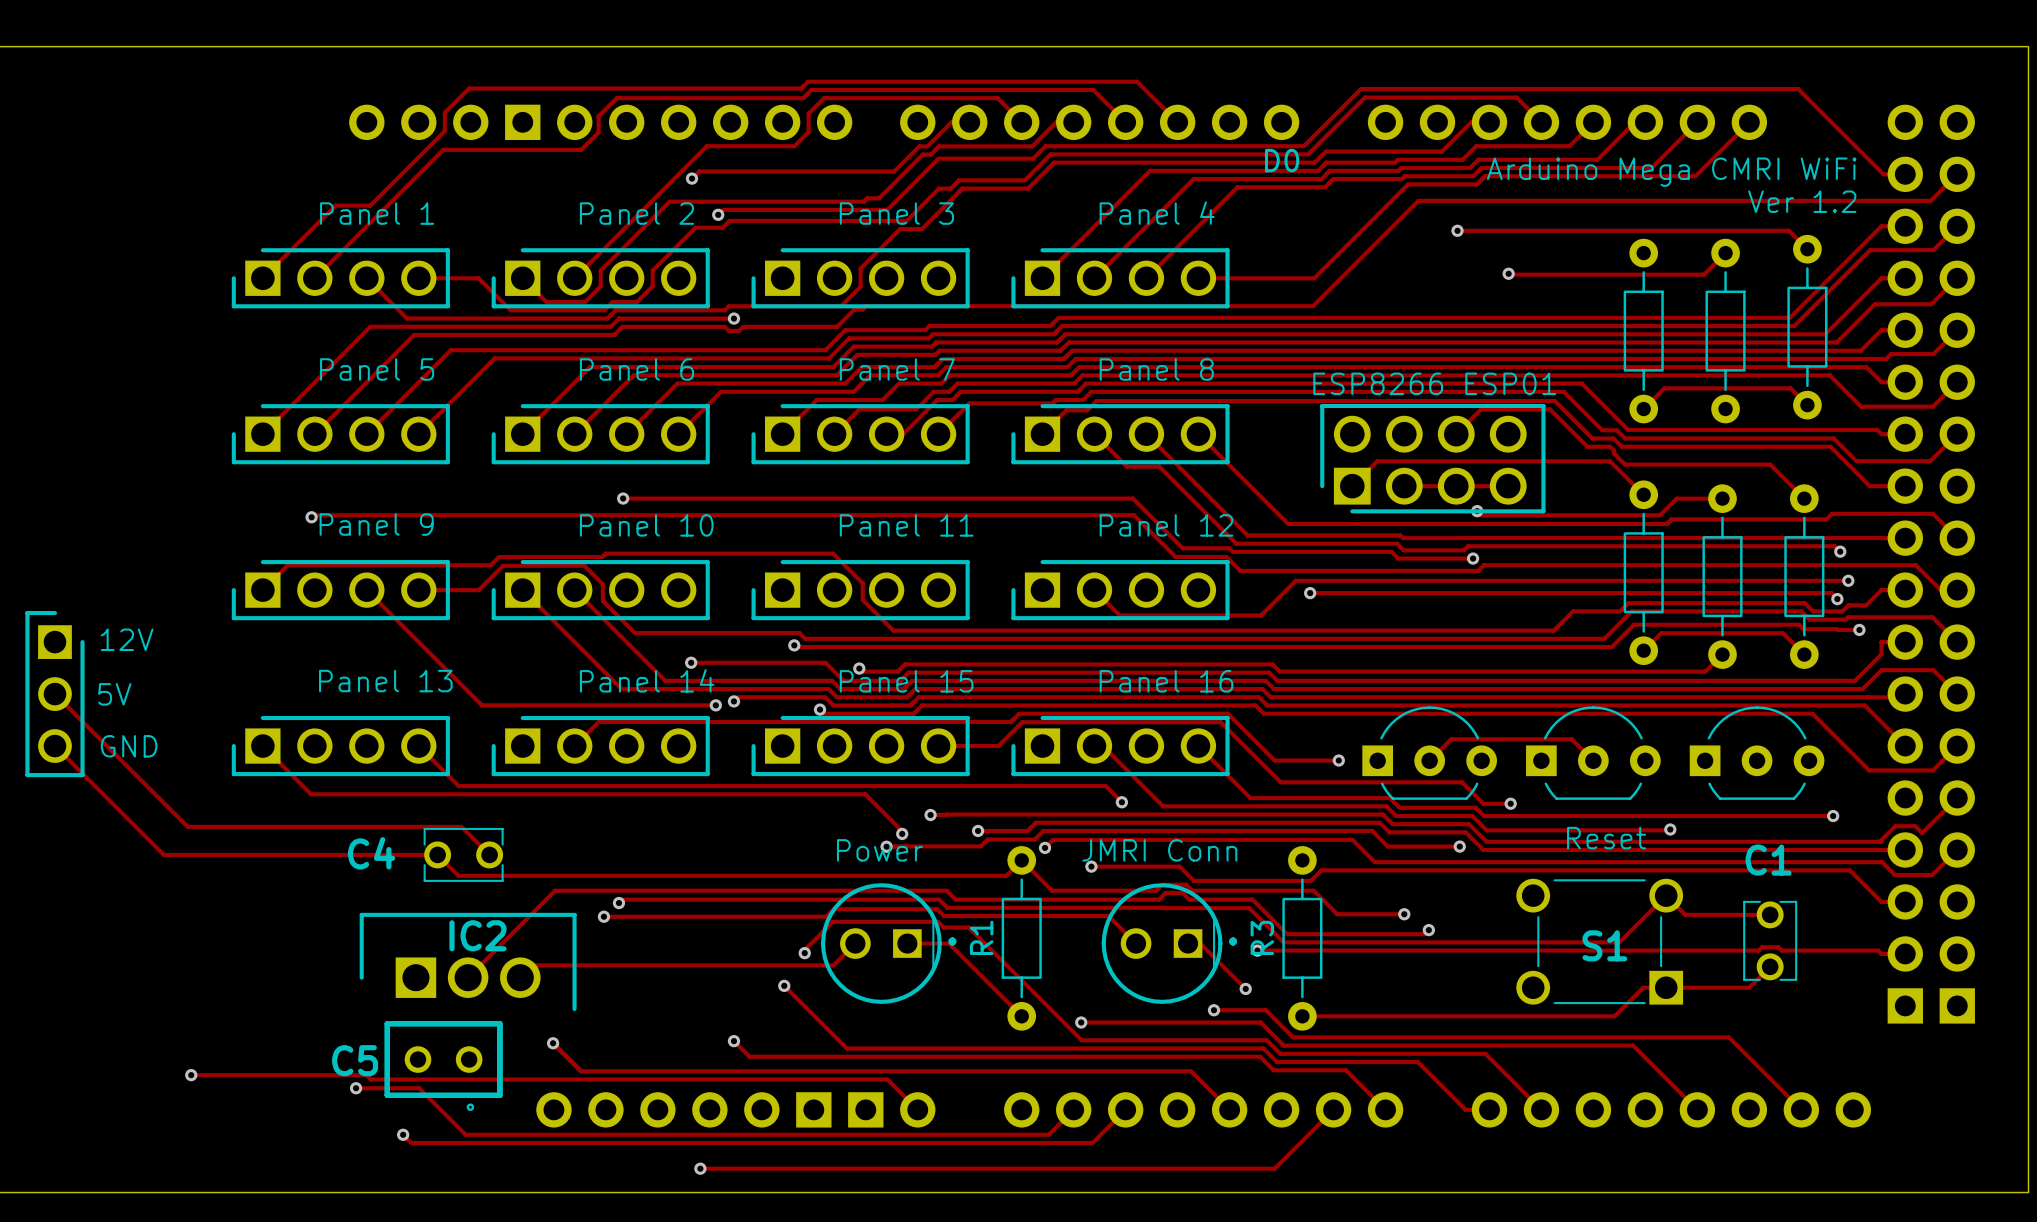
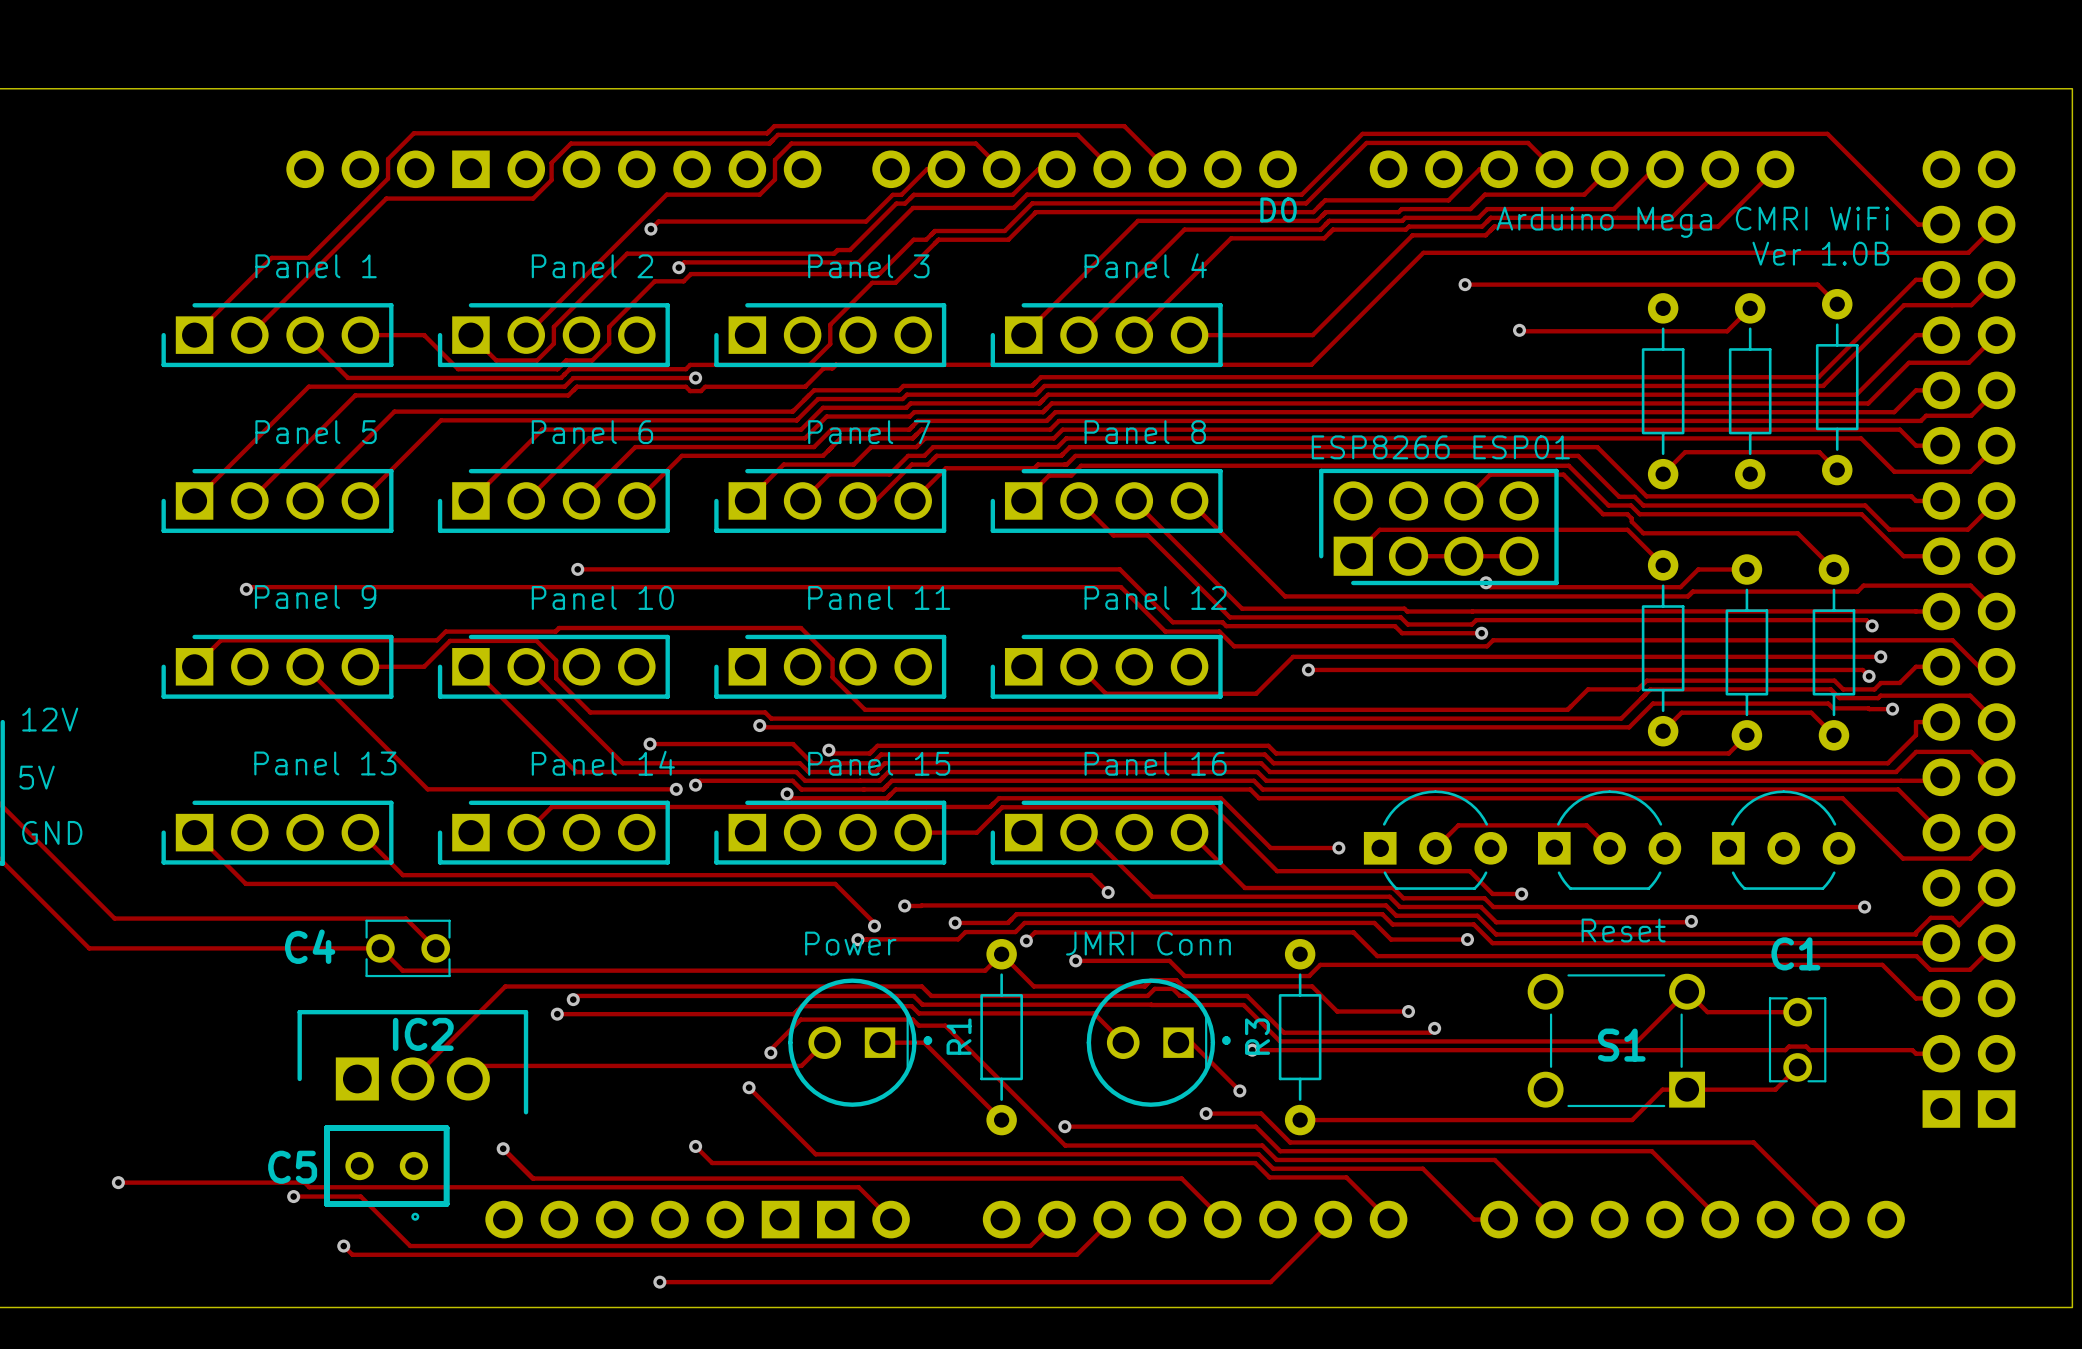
text: Ver 1.2 (1802, 201) -> Ver 1.0B (1820, 253)

